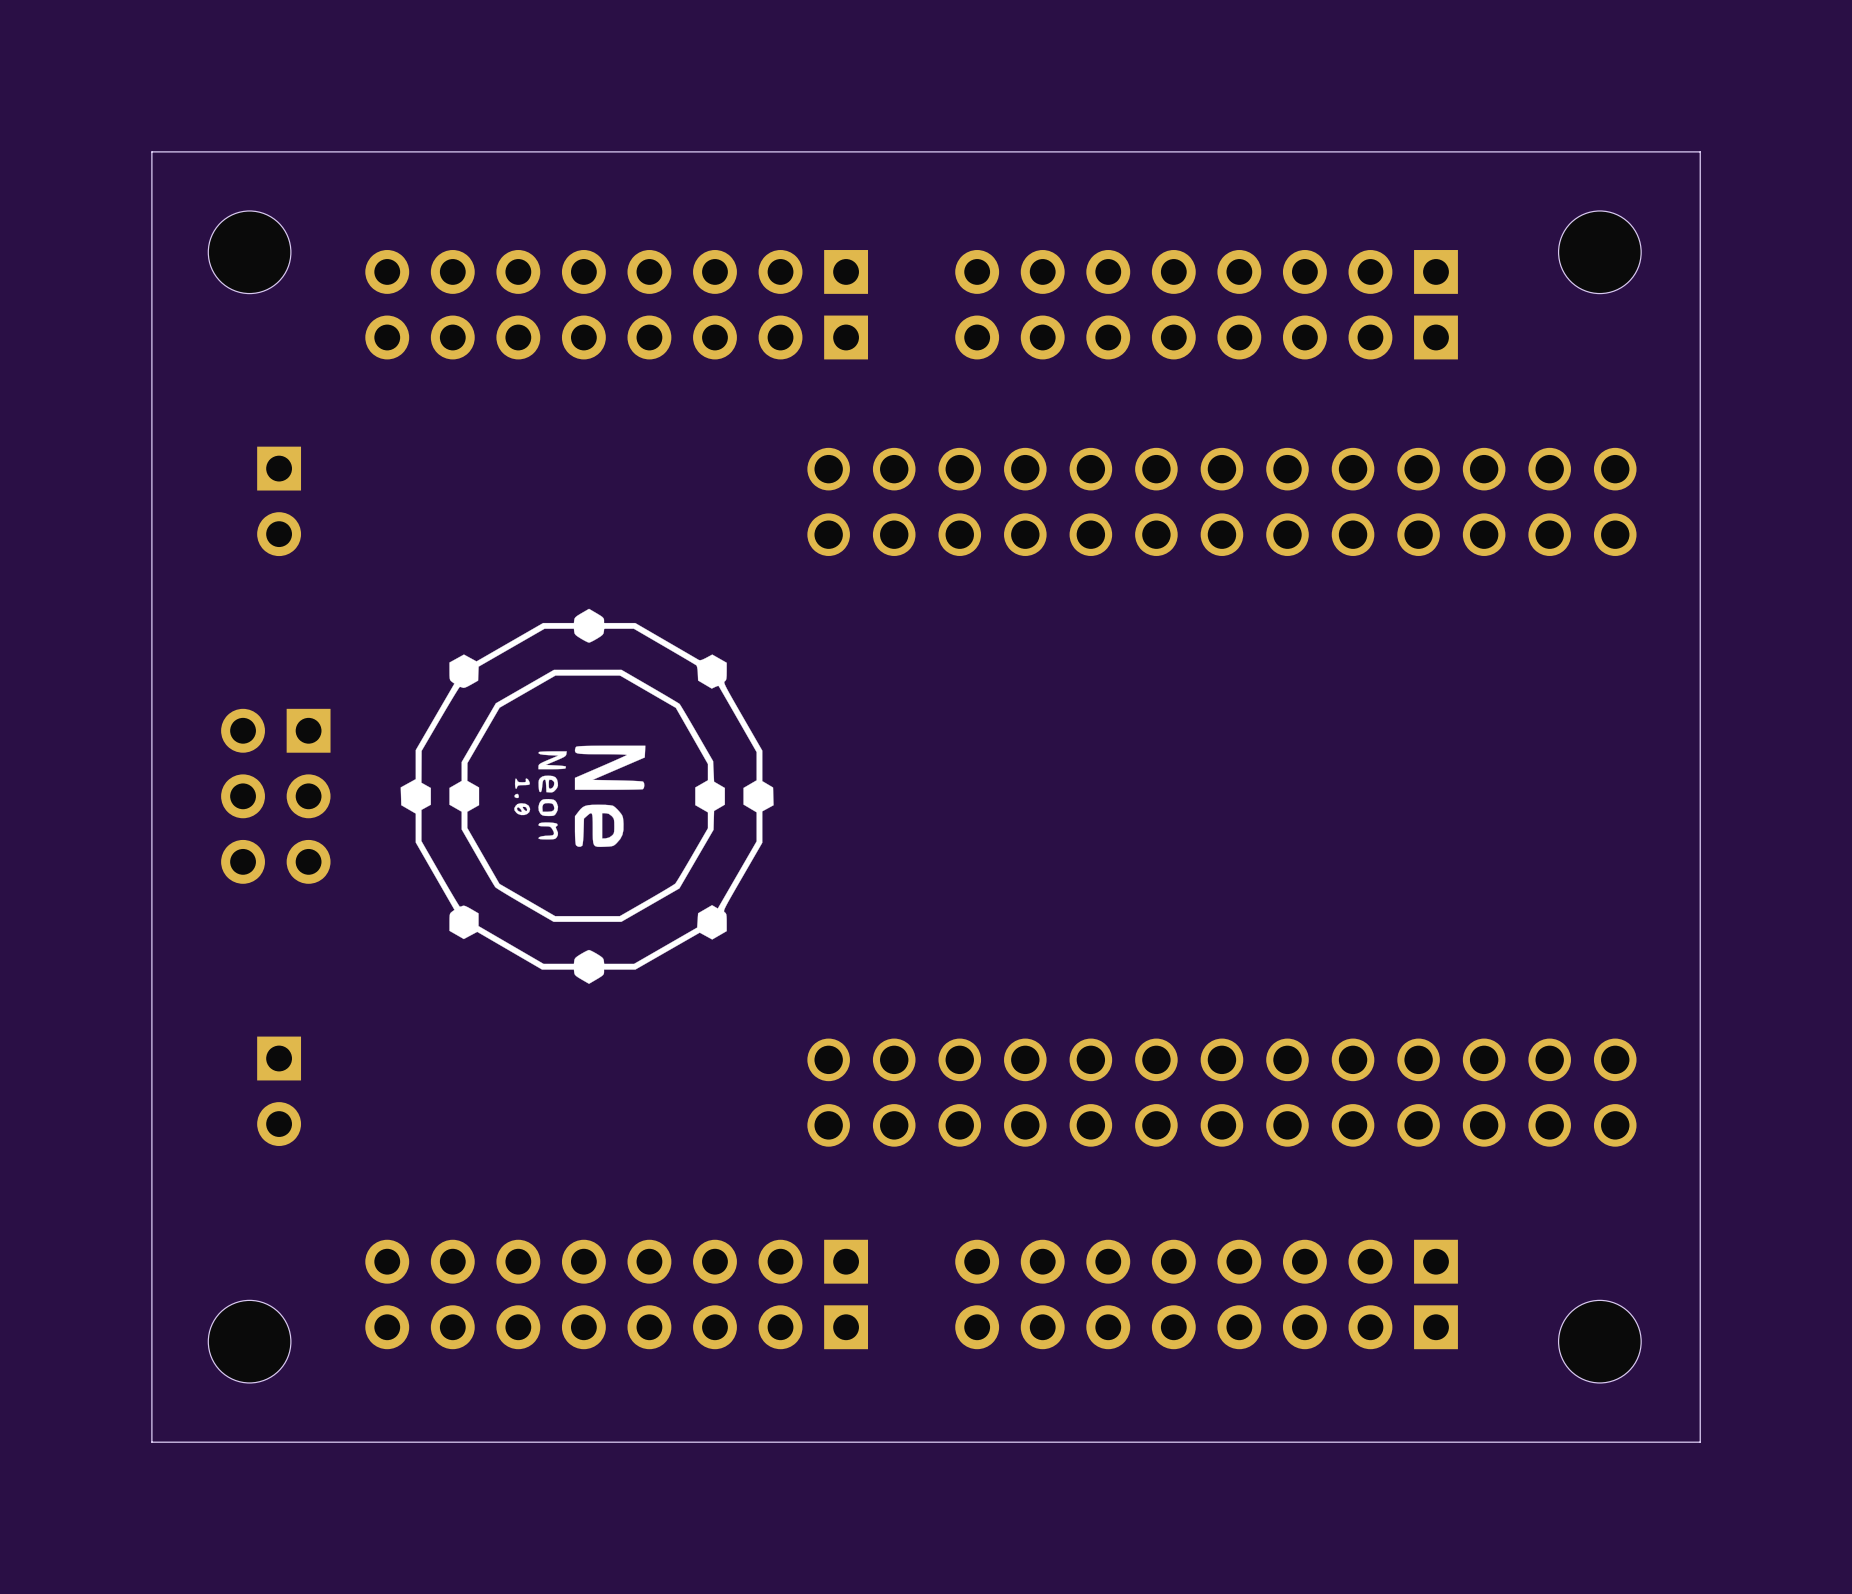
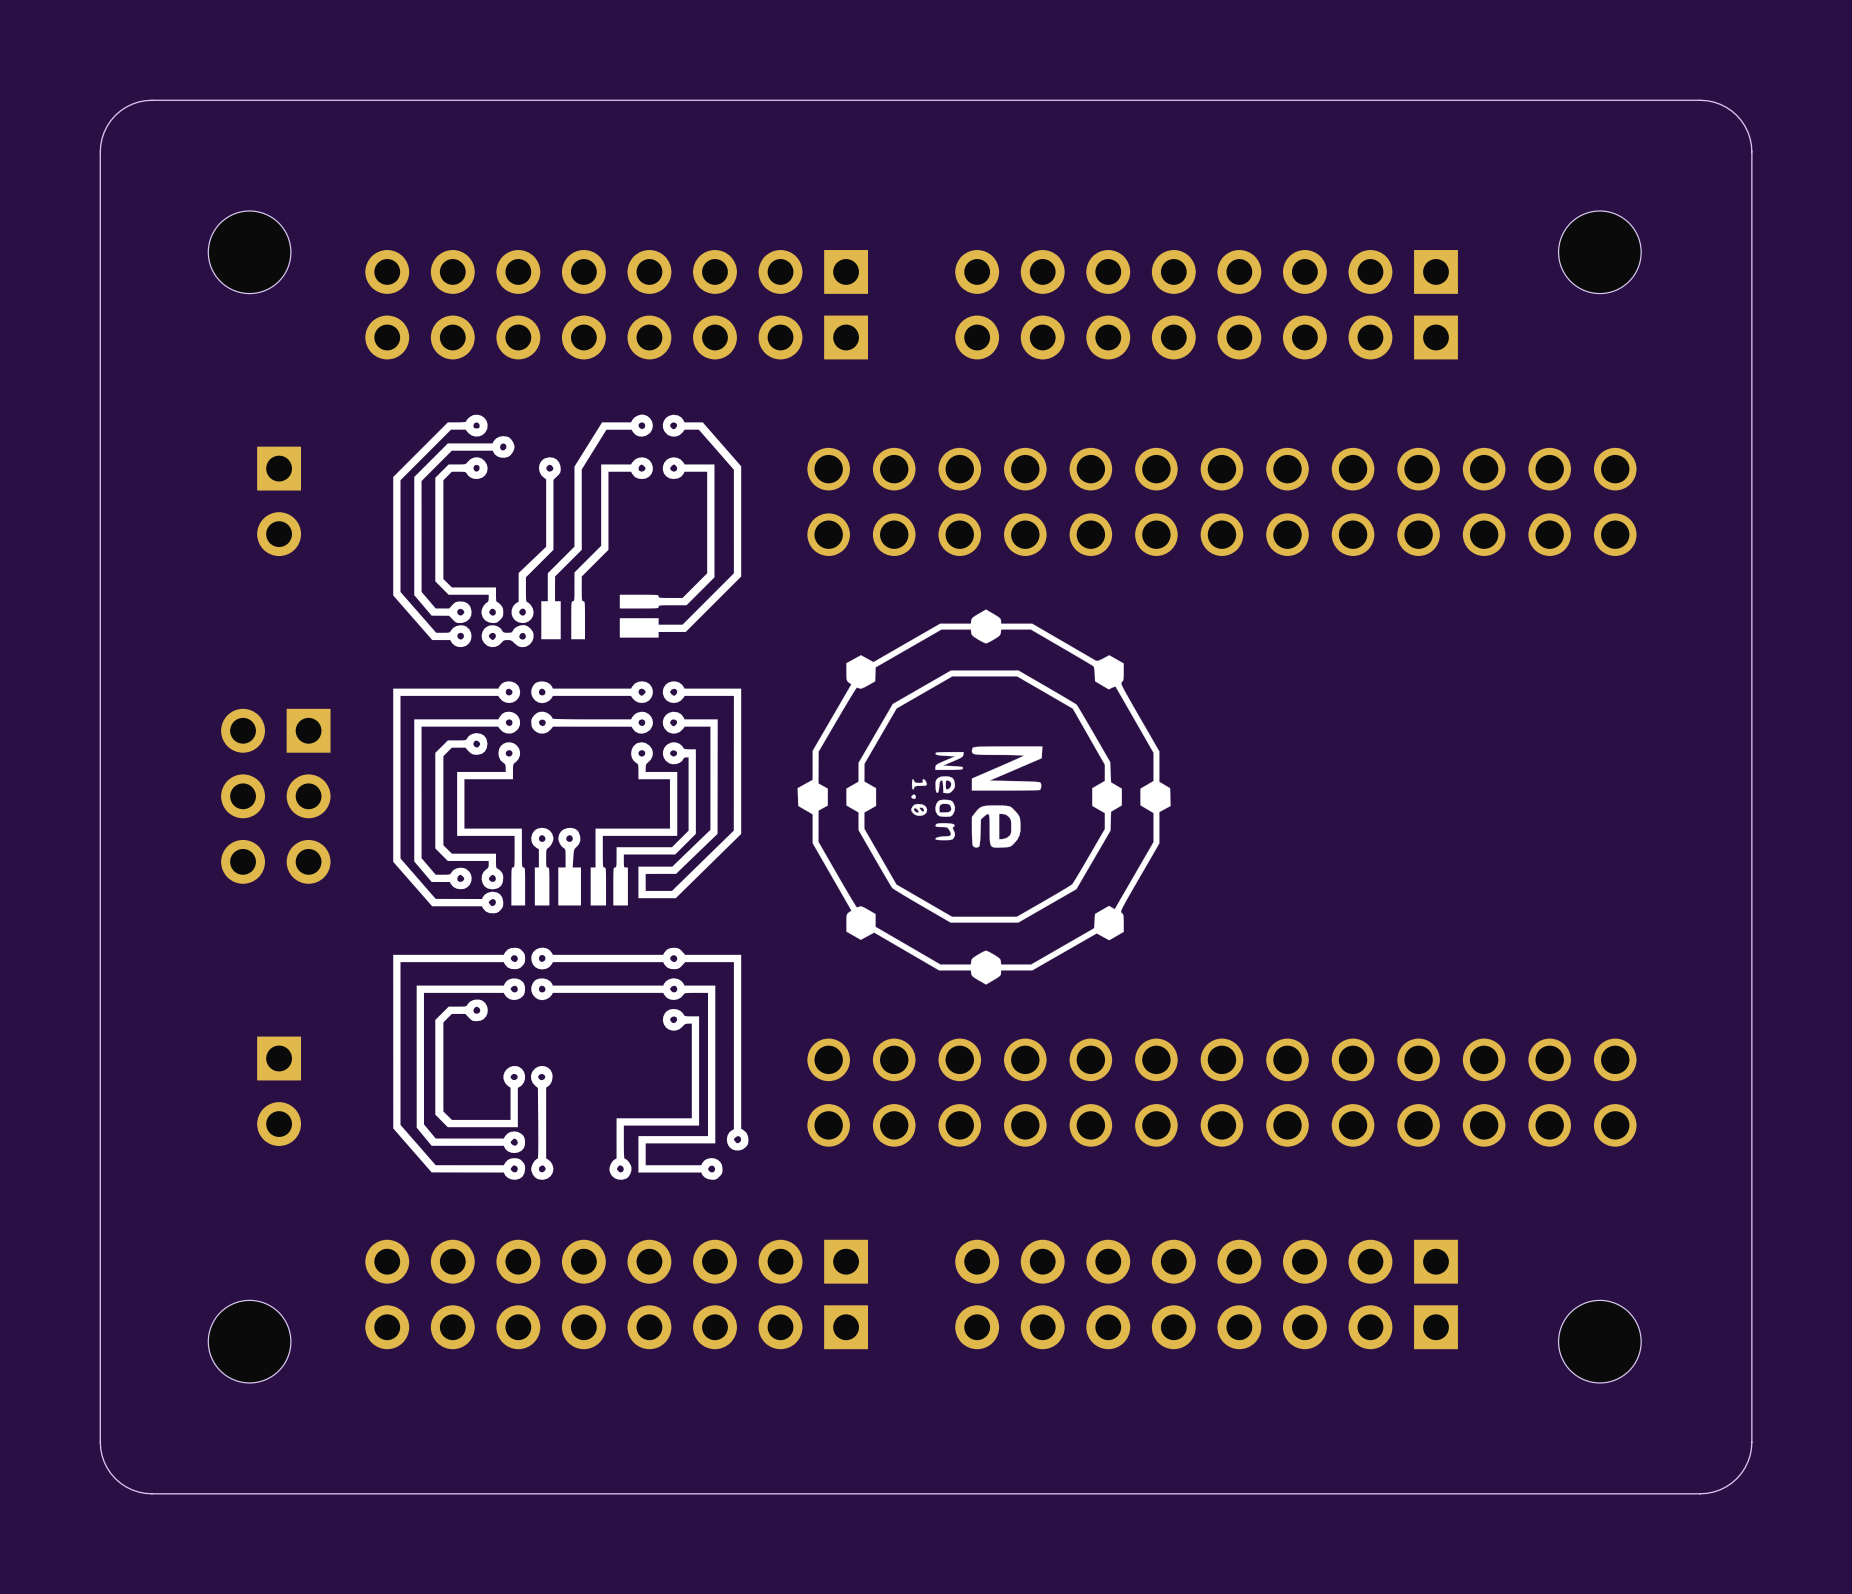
board edge: (1700, 151) (151, 151) (151, 1442) (1700, 1442) (1700, 151) -> (1700, 100) (1720, 104) (1736, 115) (1747, 132) (1751, 151) (1751, 1442) (1750, 1455) (1744, 1468) (1731, 1483) (1720, 1489) (1700, 1493) (151, 1493) (132, 1489) (120, 1483) (110, 1473) (104, 1461) (100, 1442) (100, 151) (104, 132) (110, 120) (120, 110) (138, 102) (151, 100) (1700, 100)
drawing: none -> [393, 414, 749, 1180]
drawing position: (587, 796) -> (984, 797)

